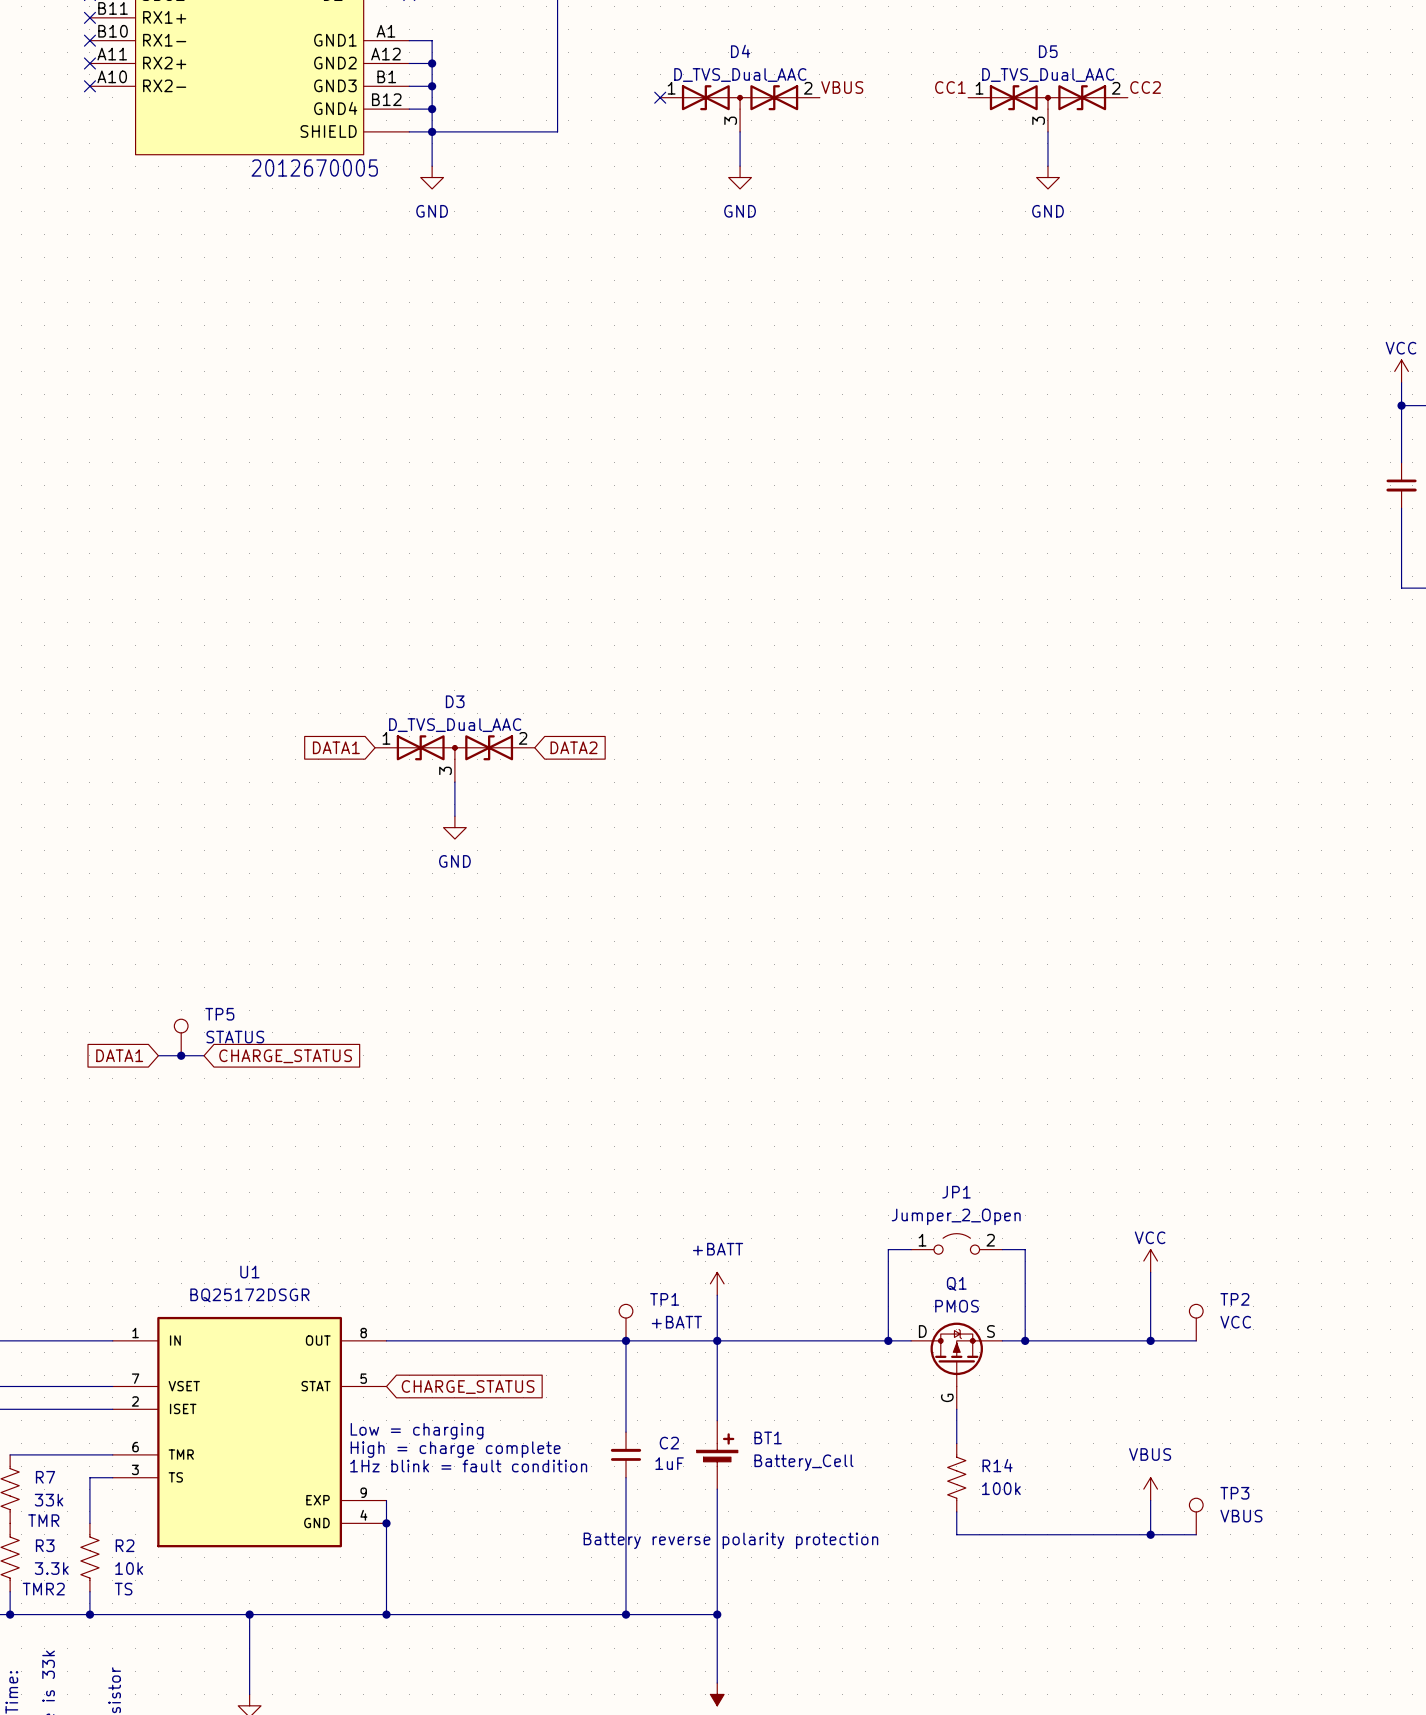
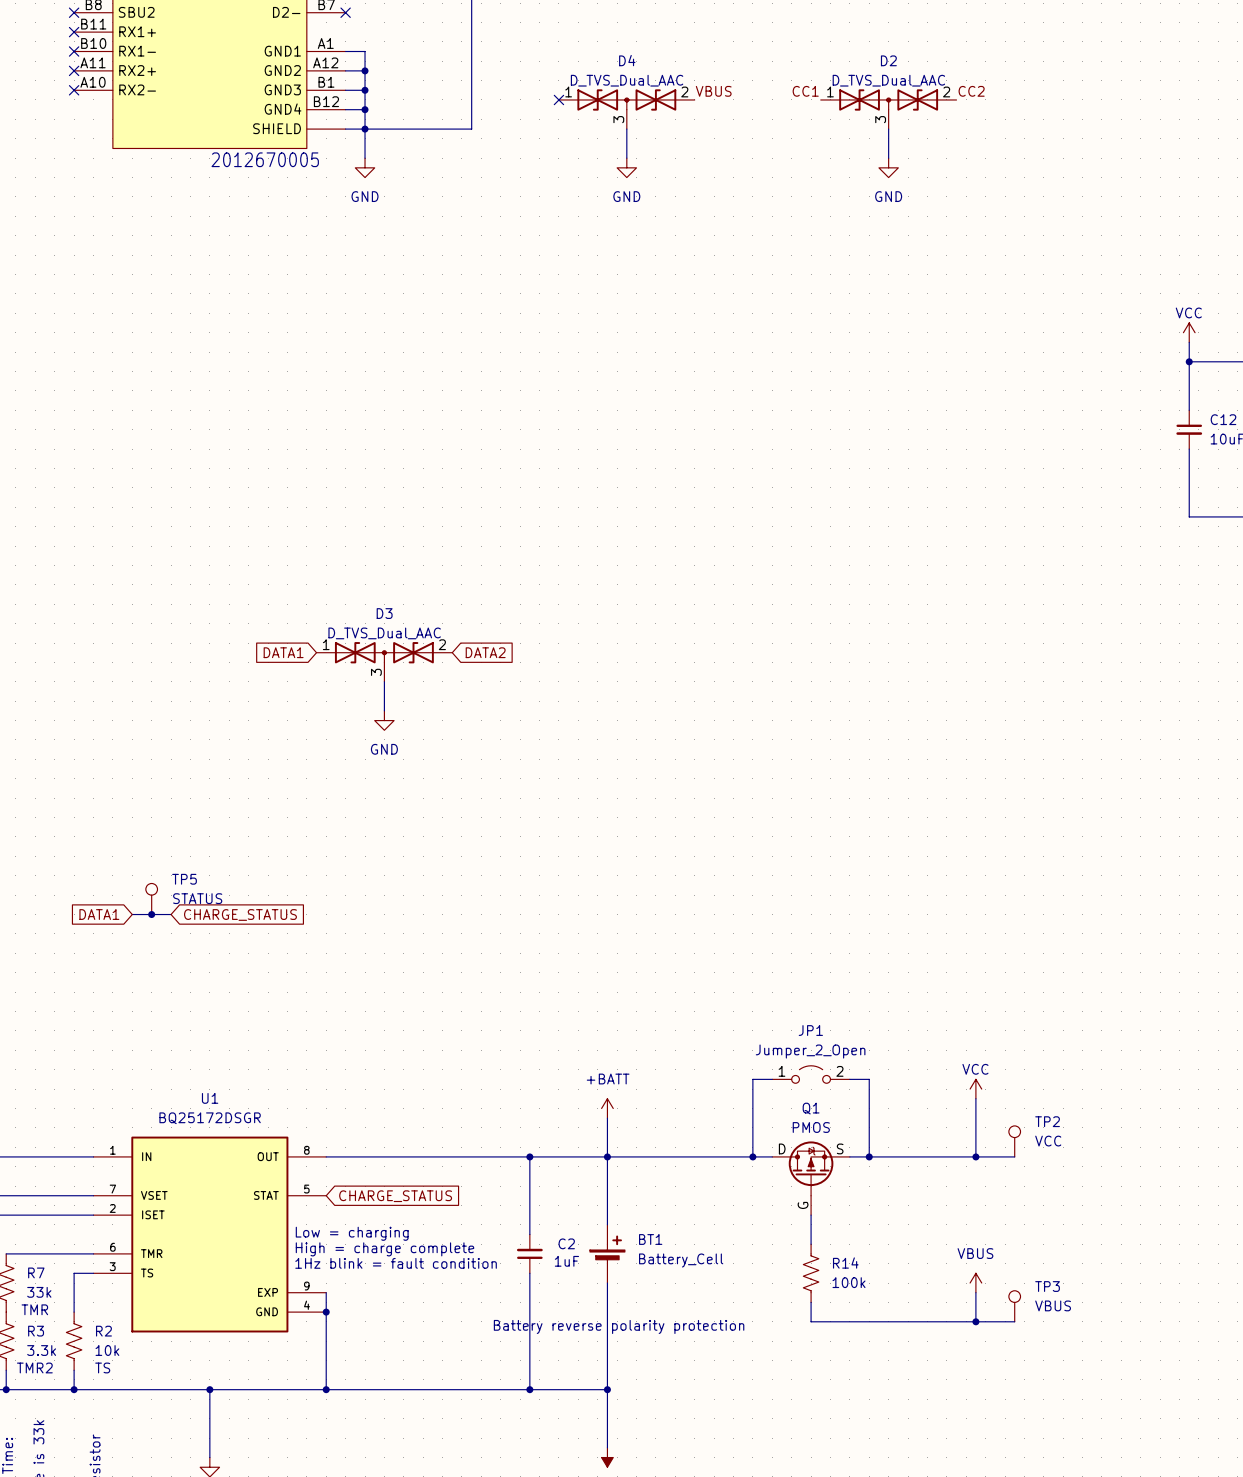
D5 name: D5 (1048, 51) -> D2 (888, 60)
TP1: +BATT (626, 1322) -> none

